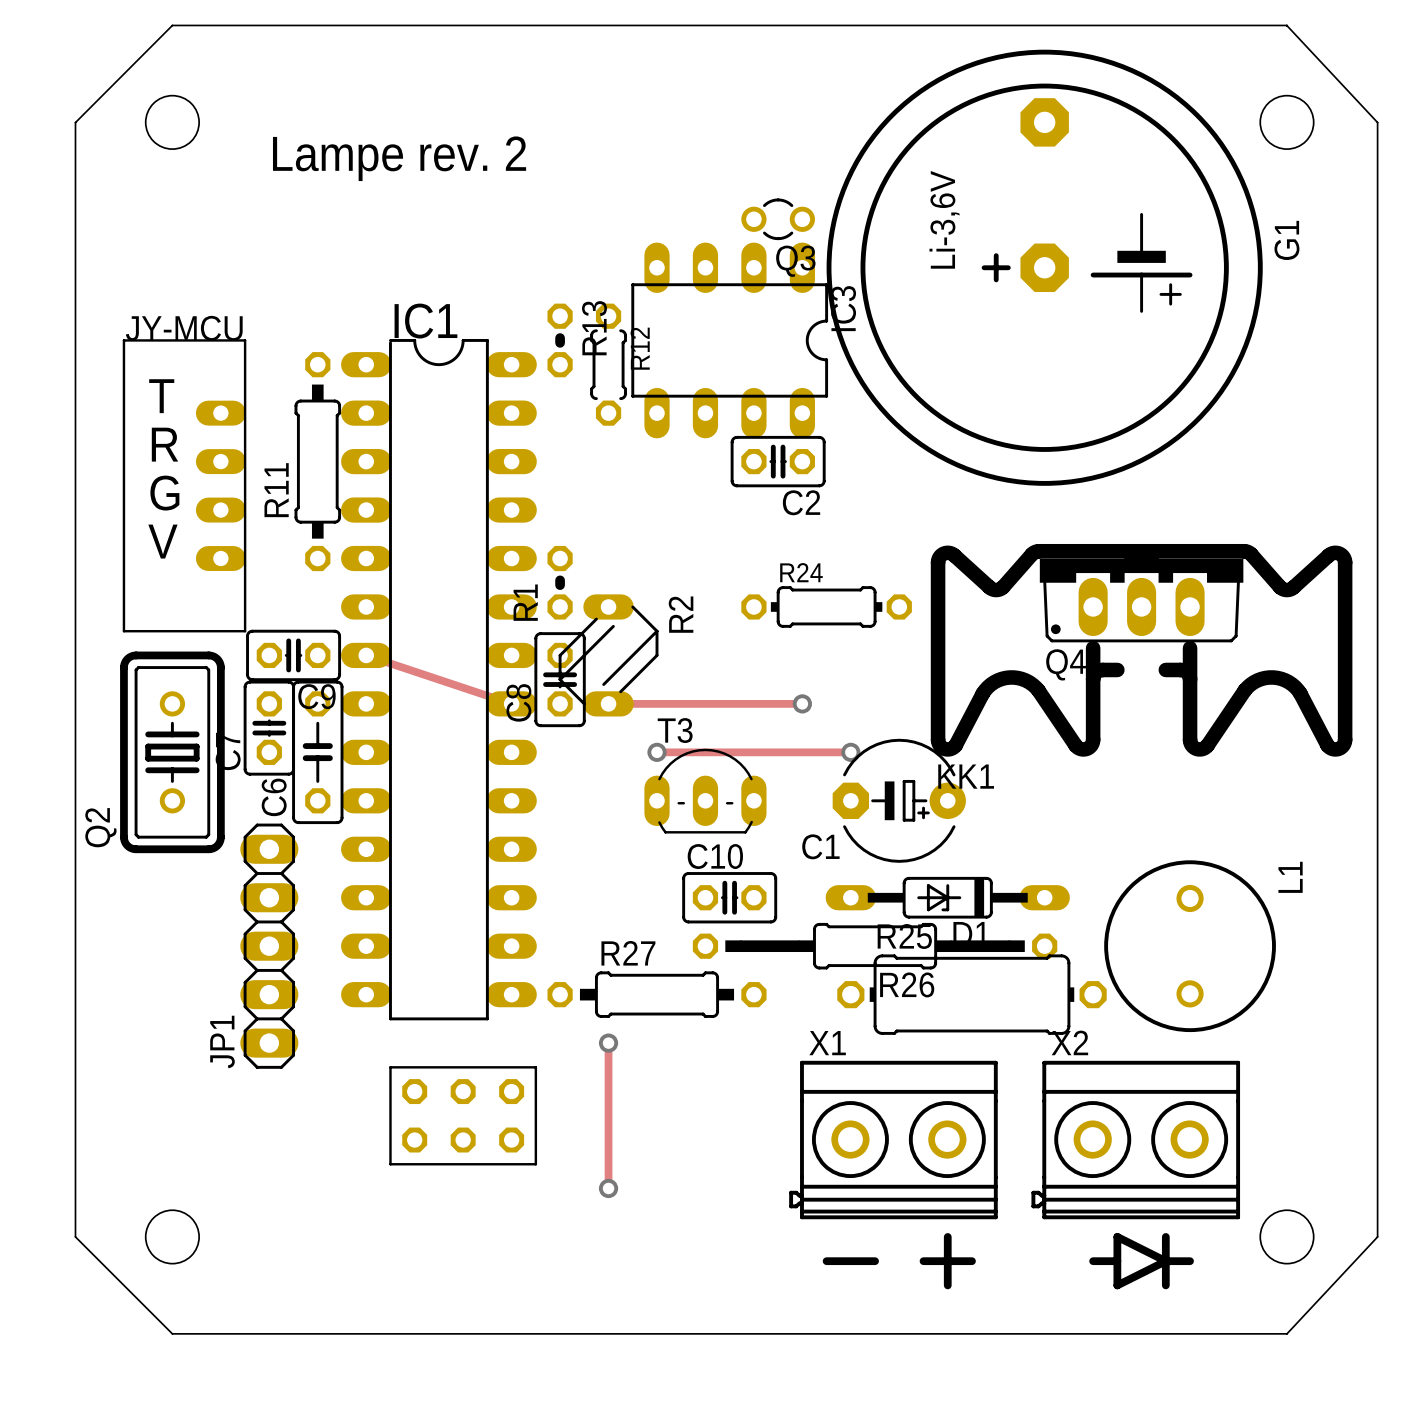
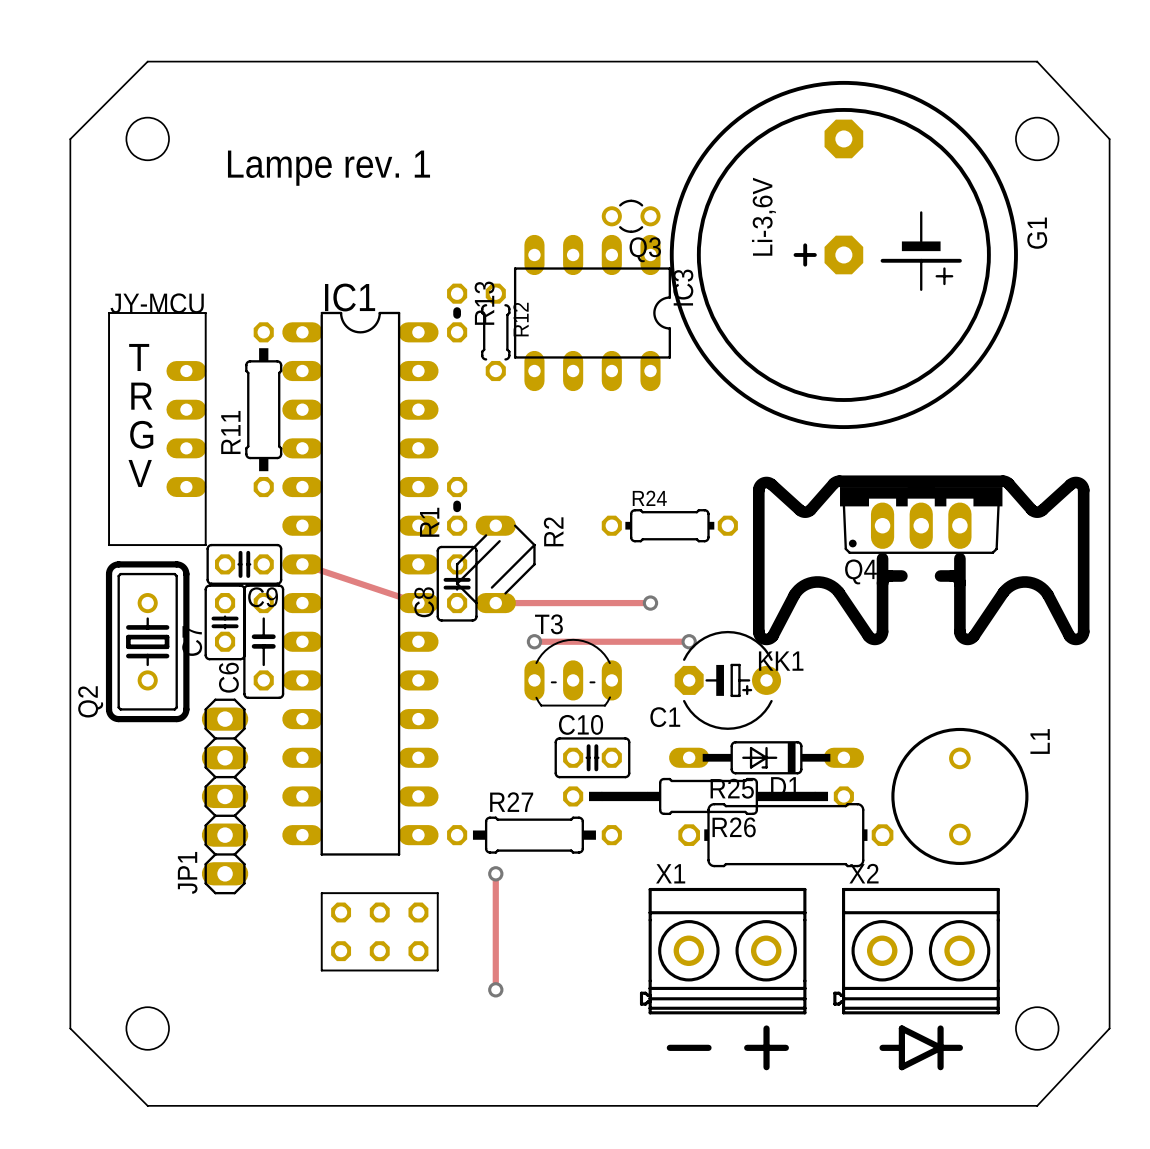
text: Lampe rev. 2 (399, 158) -> Lampe rev. 1 (329, 168)
C2: (778, 461) -> none

